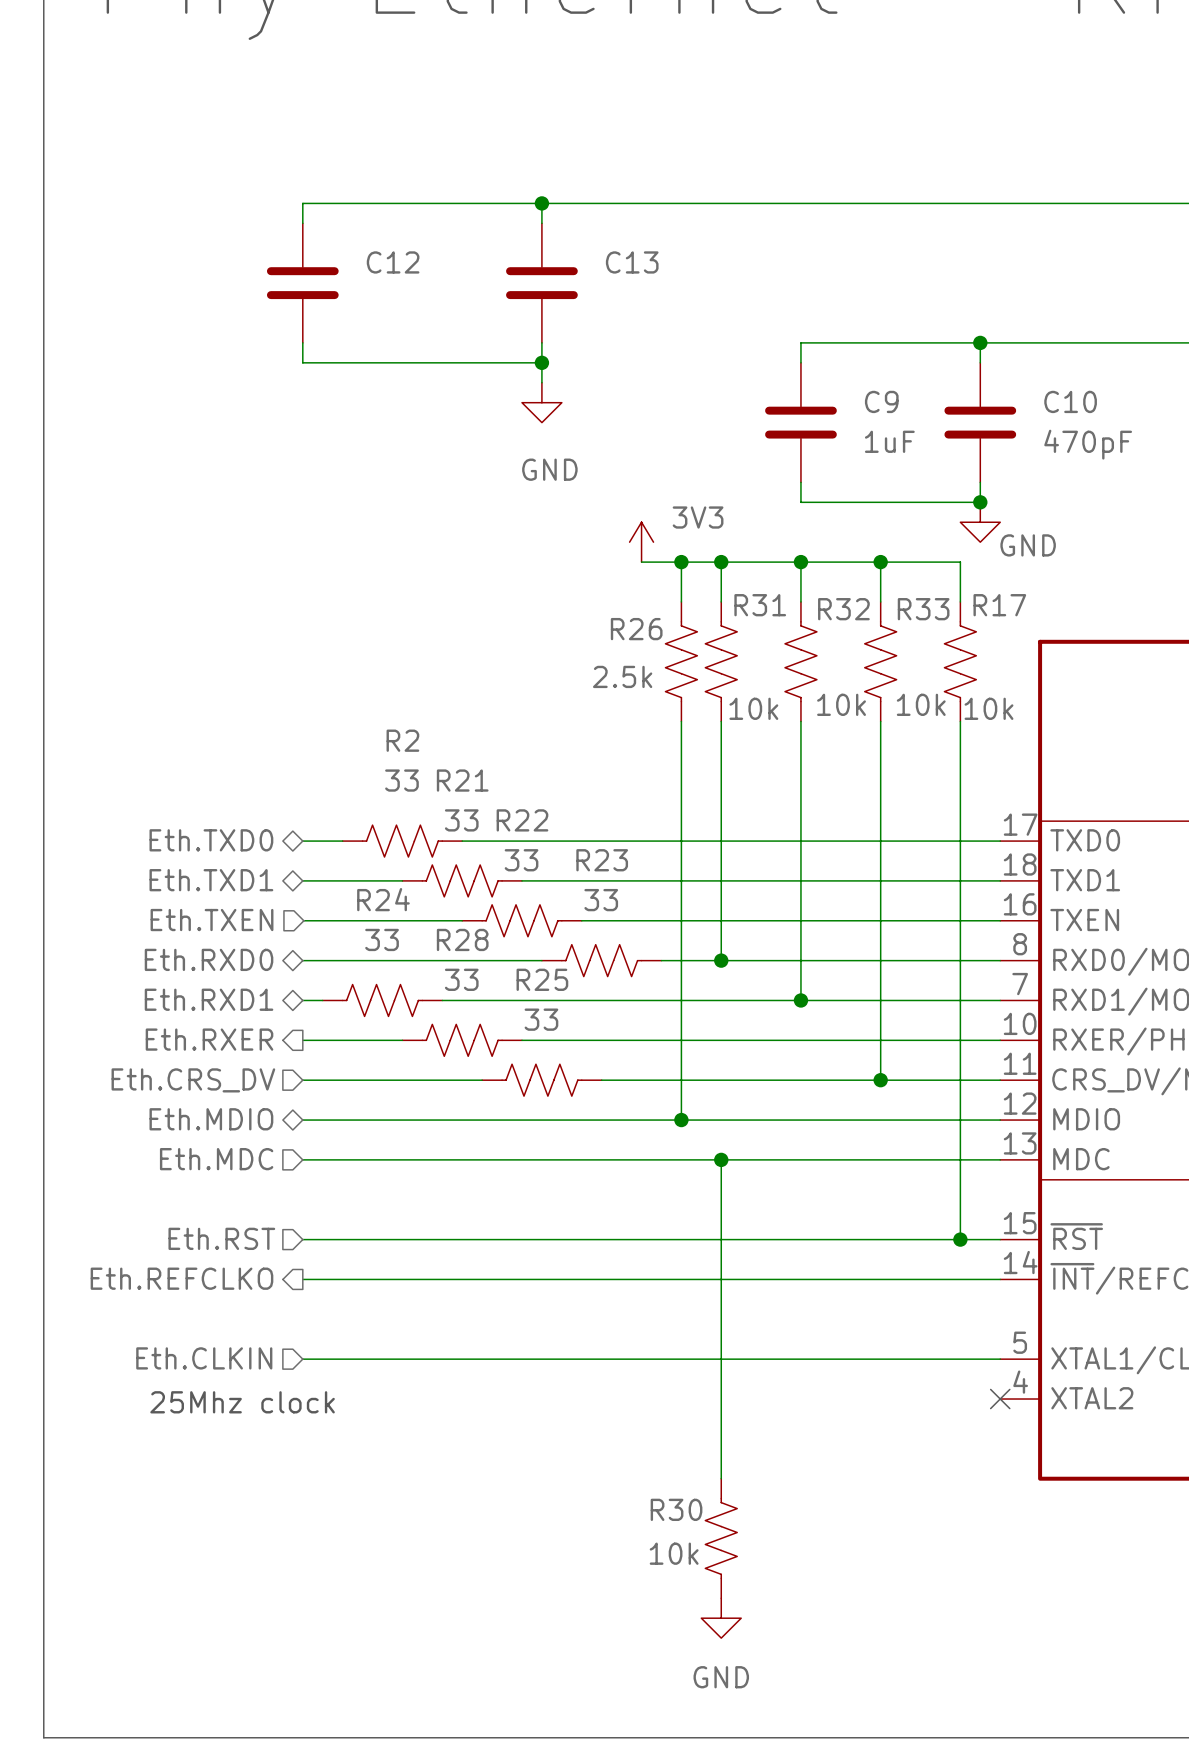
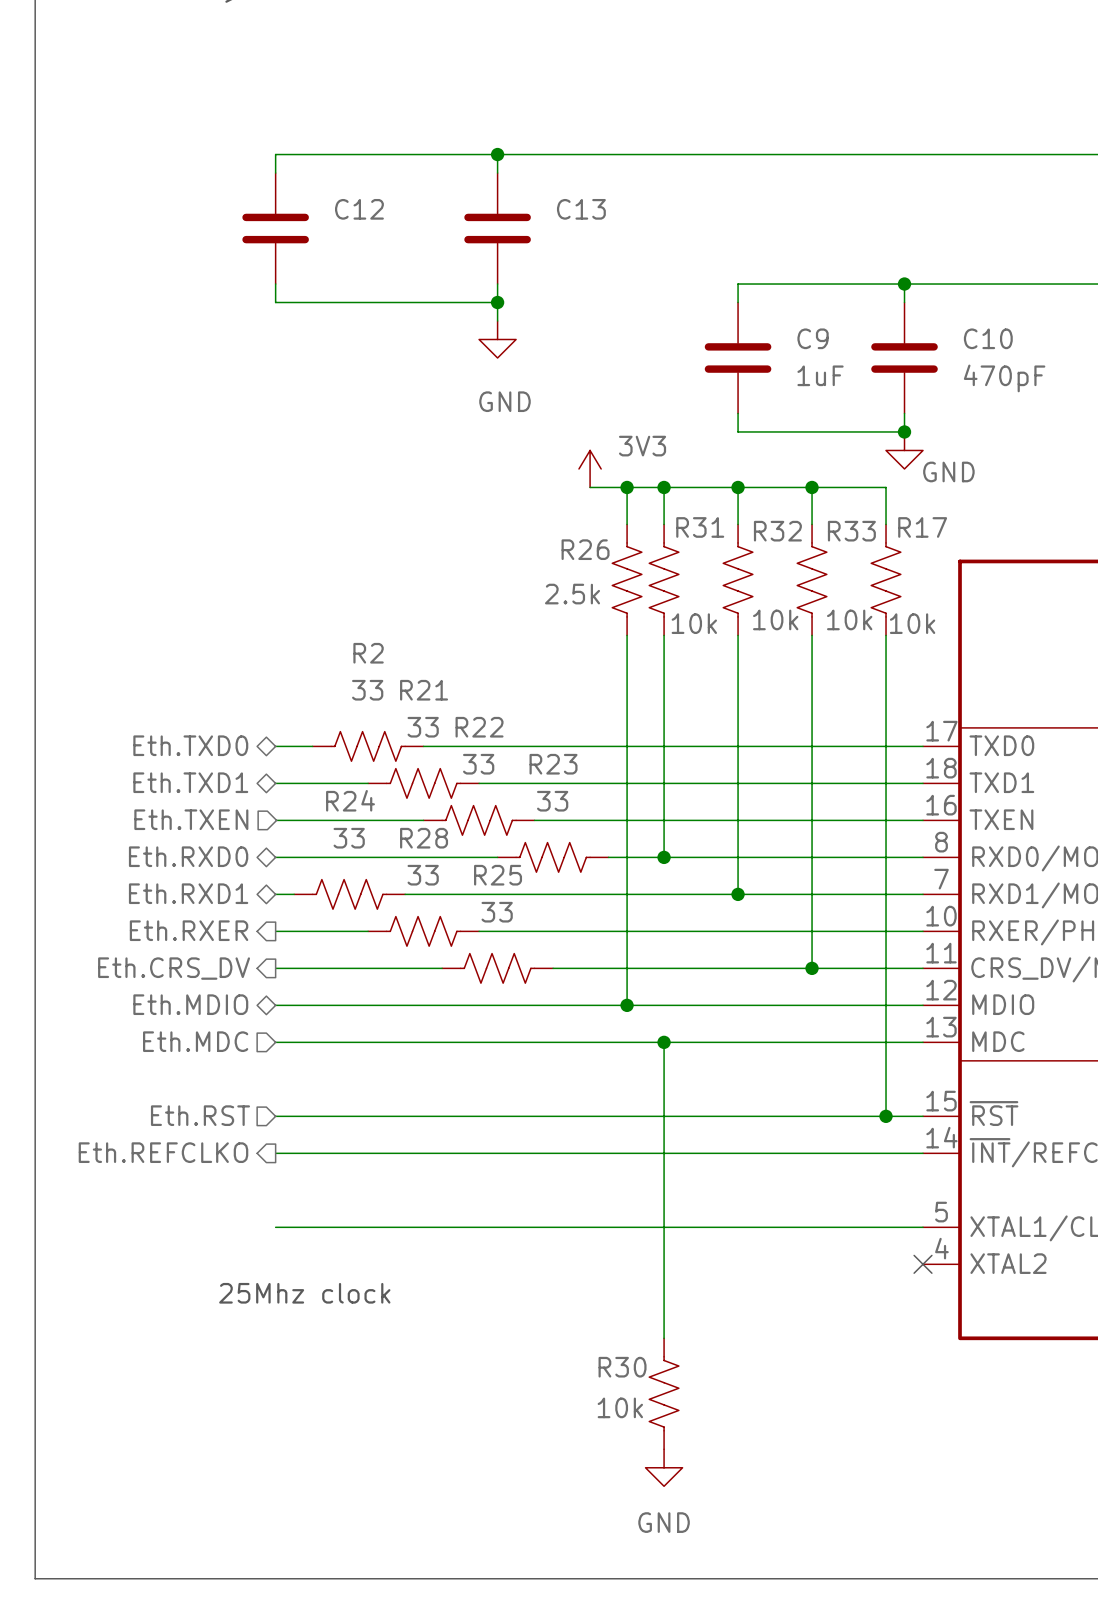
hierarchical label shape: input (193, 1080) -> output (174, 968)
hierarchical label: Eth.CLKIN (204, 1358) -> none
text position: 25Mhz clock (242, 1402) -> 25Mhz clock (304, 1293)

